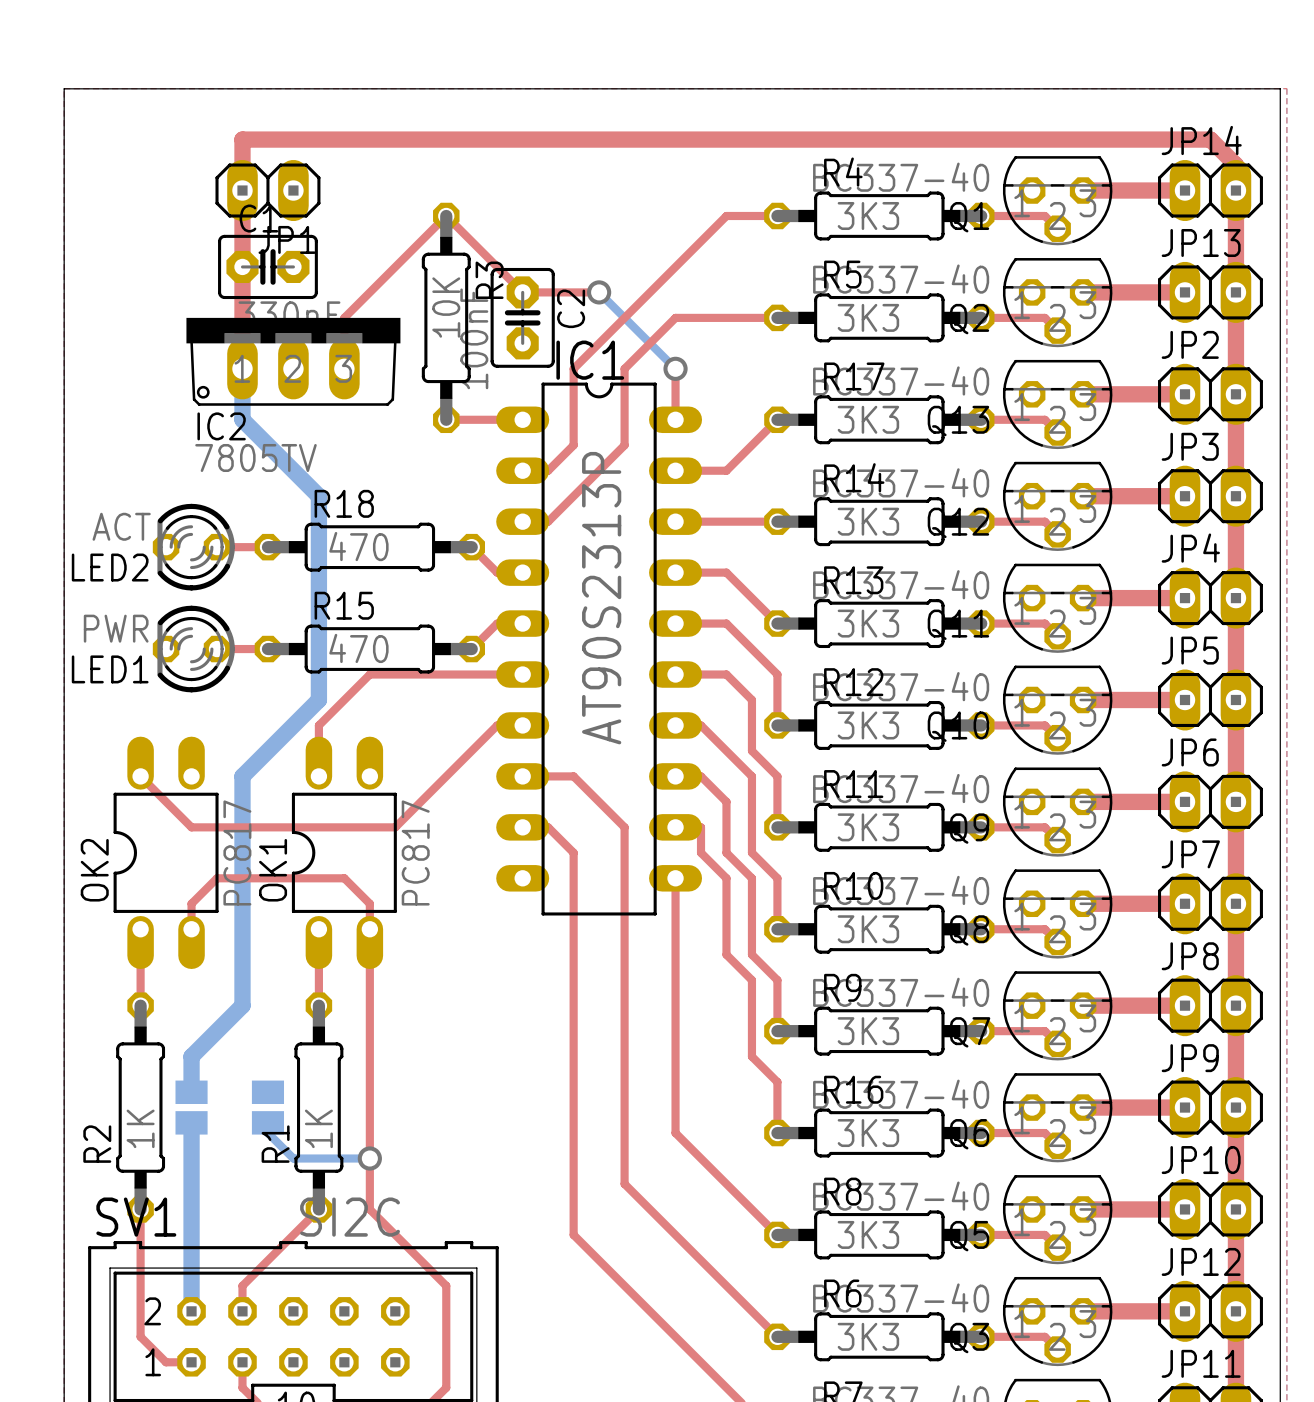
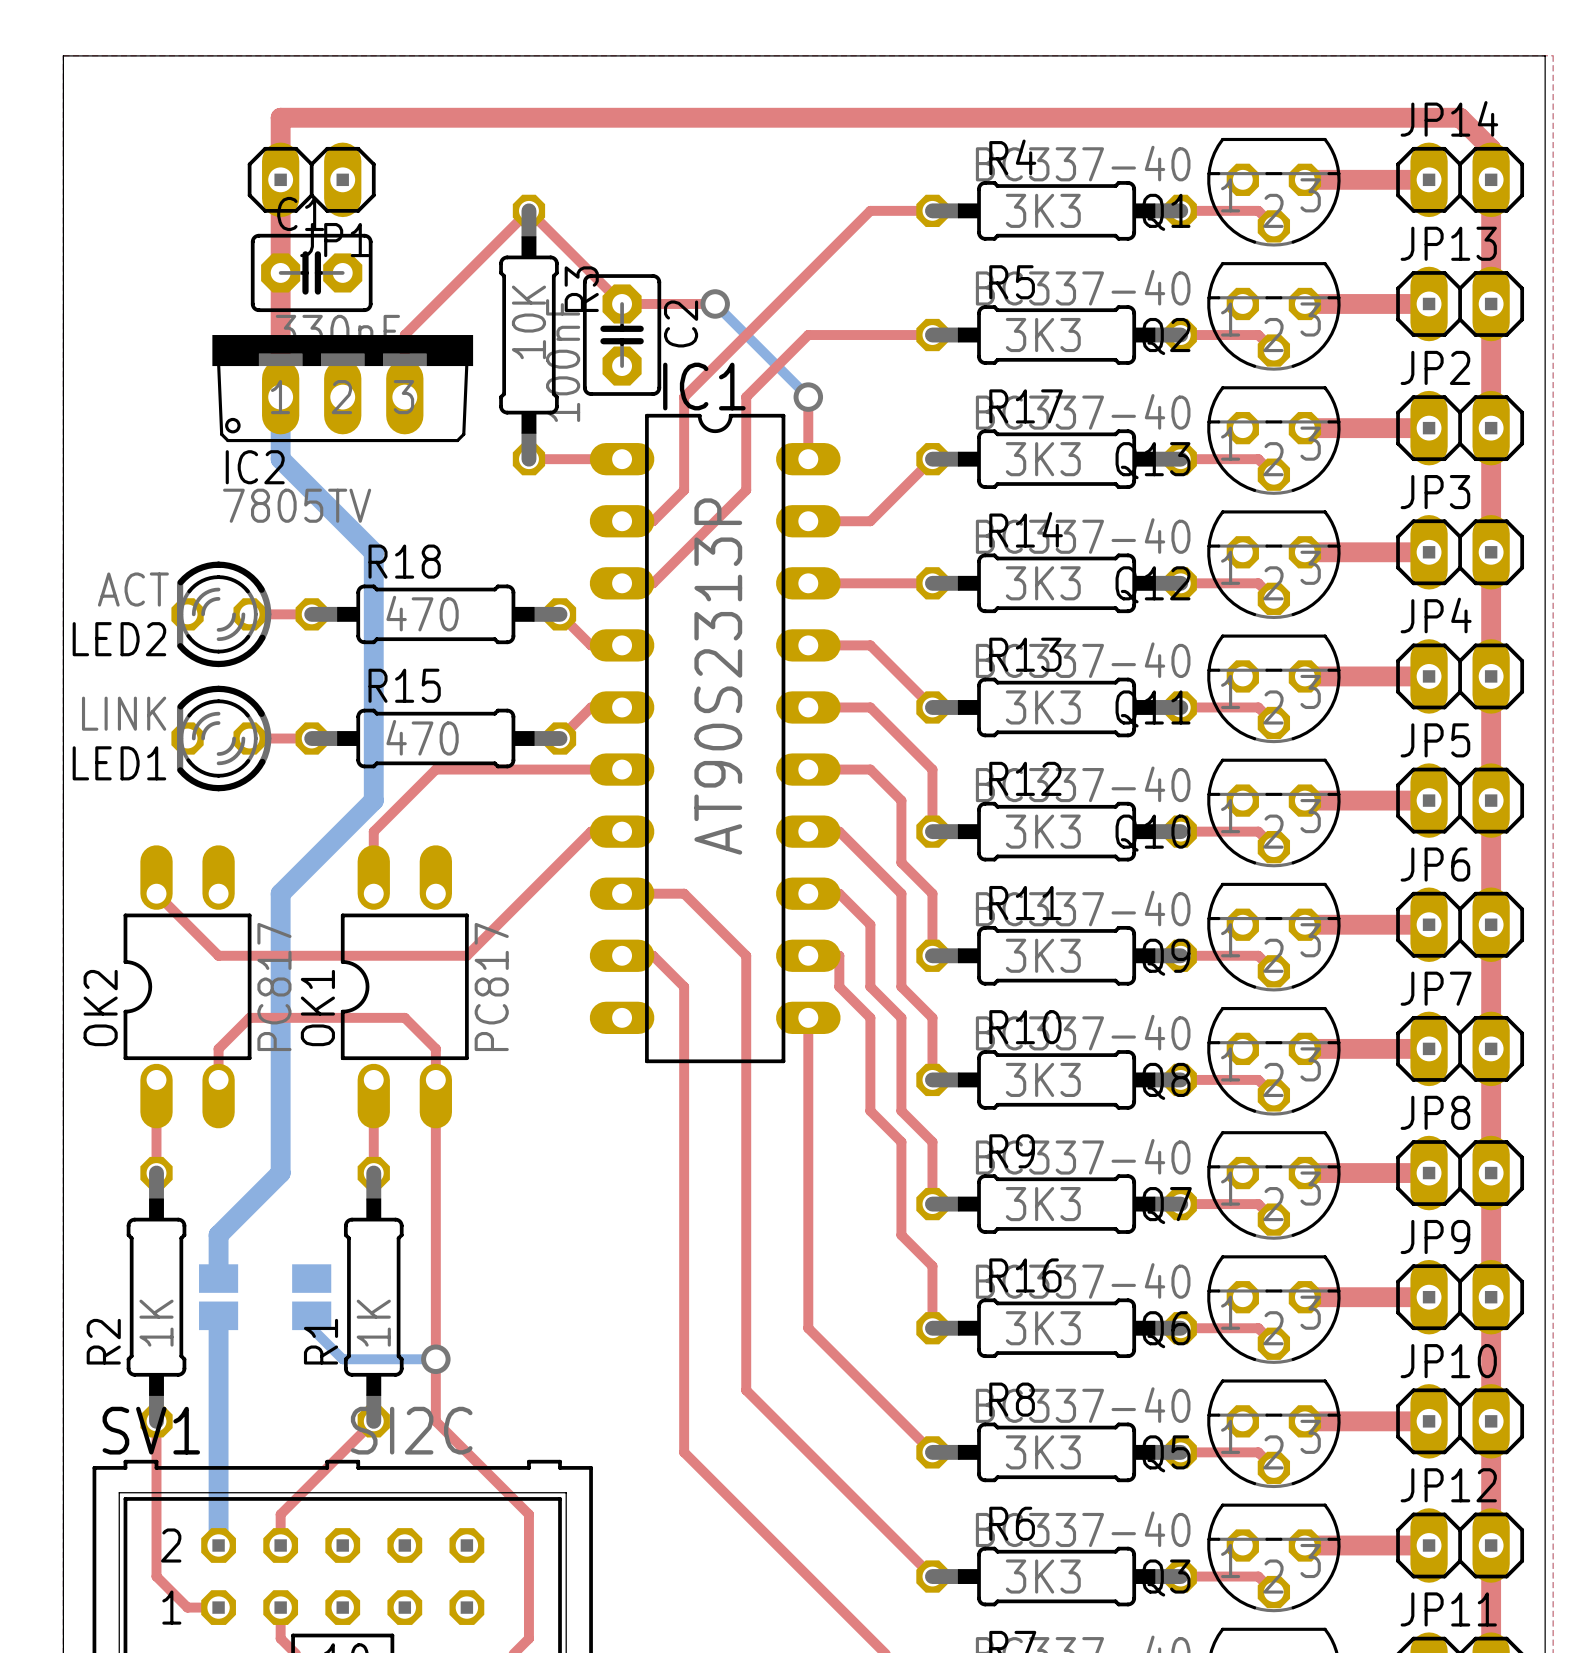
LED1 value: PWR (116, 628) -> LINK (124, 713)

